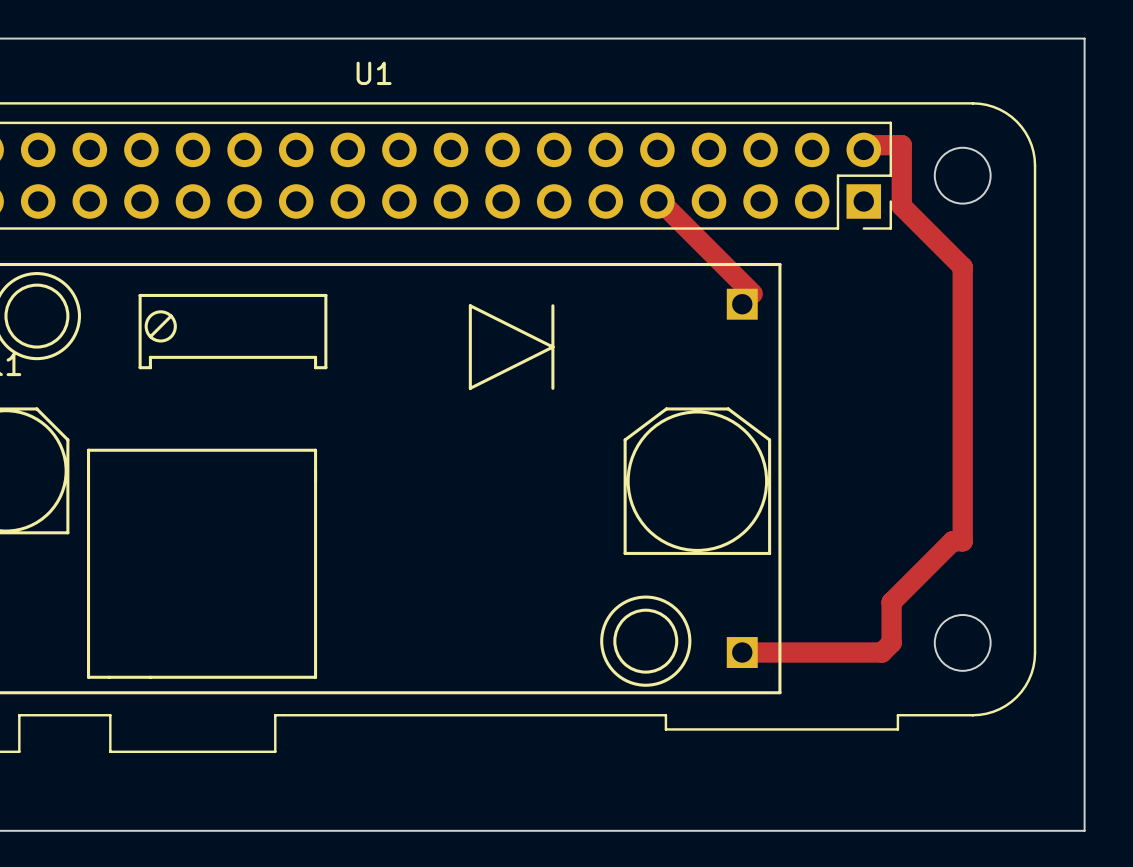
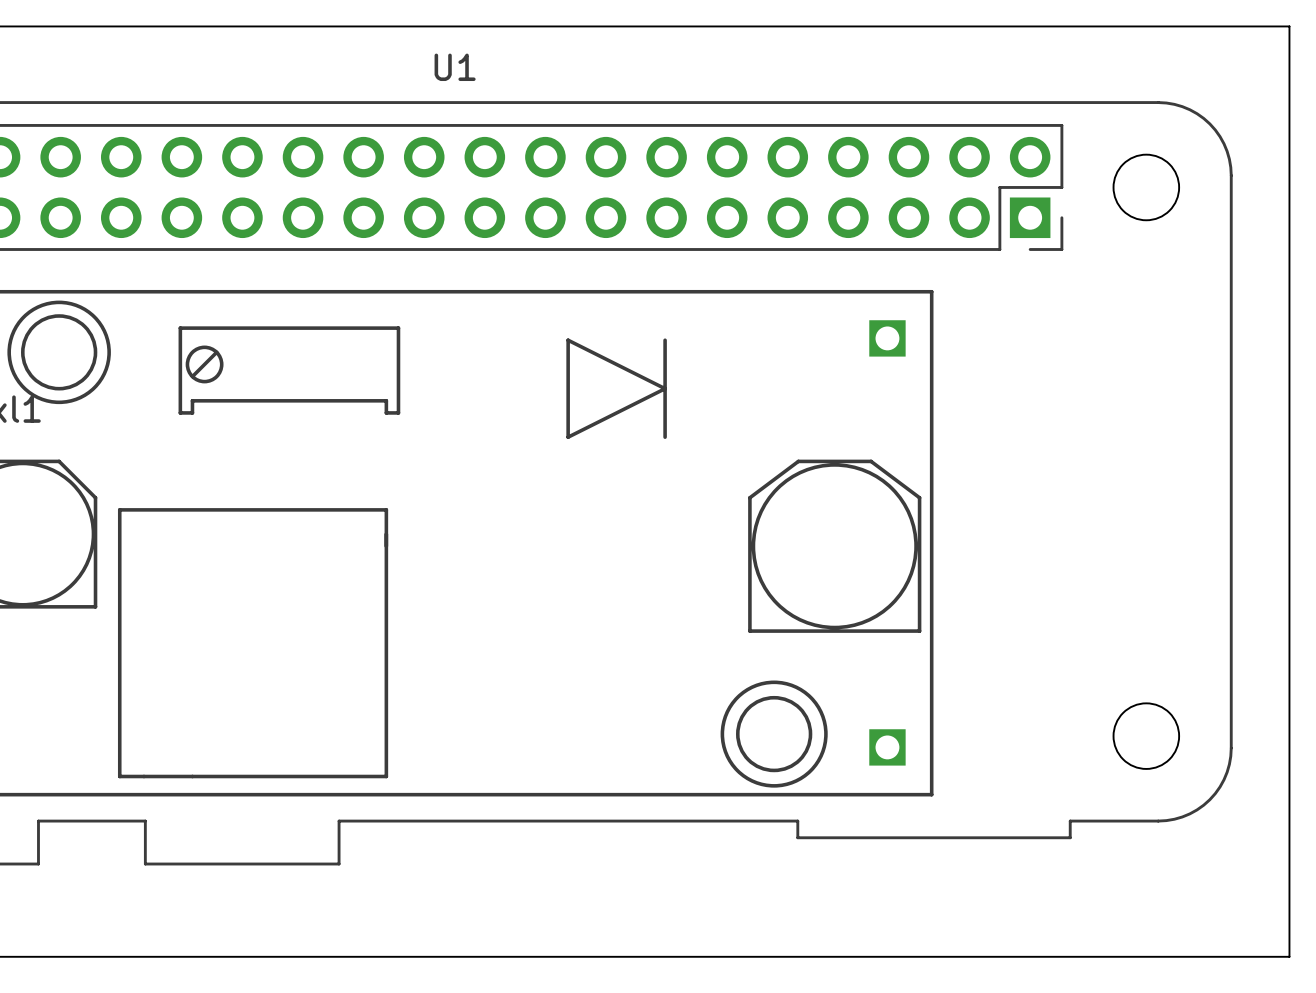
track: (868, 145) (901, 145) (901, 206) (962, 267) (962, 541) (952, 541) (891, 602) (891, 642) (882, 652) (742, 652) -> none
track: (660, 201) (752, 293) -> none

